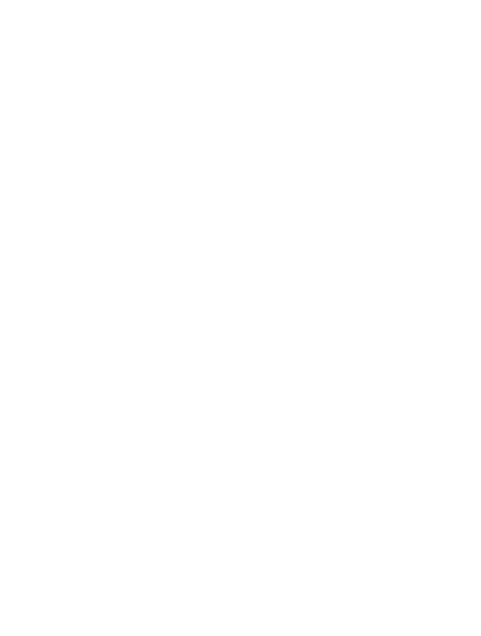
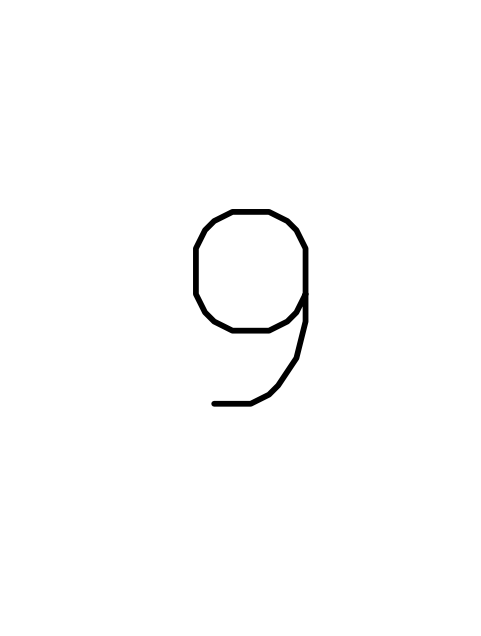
text: none -> 9 (250, 307)

